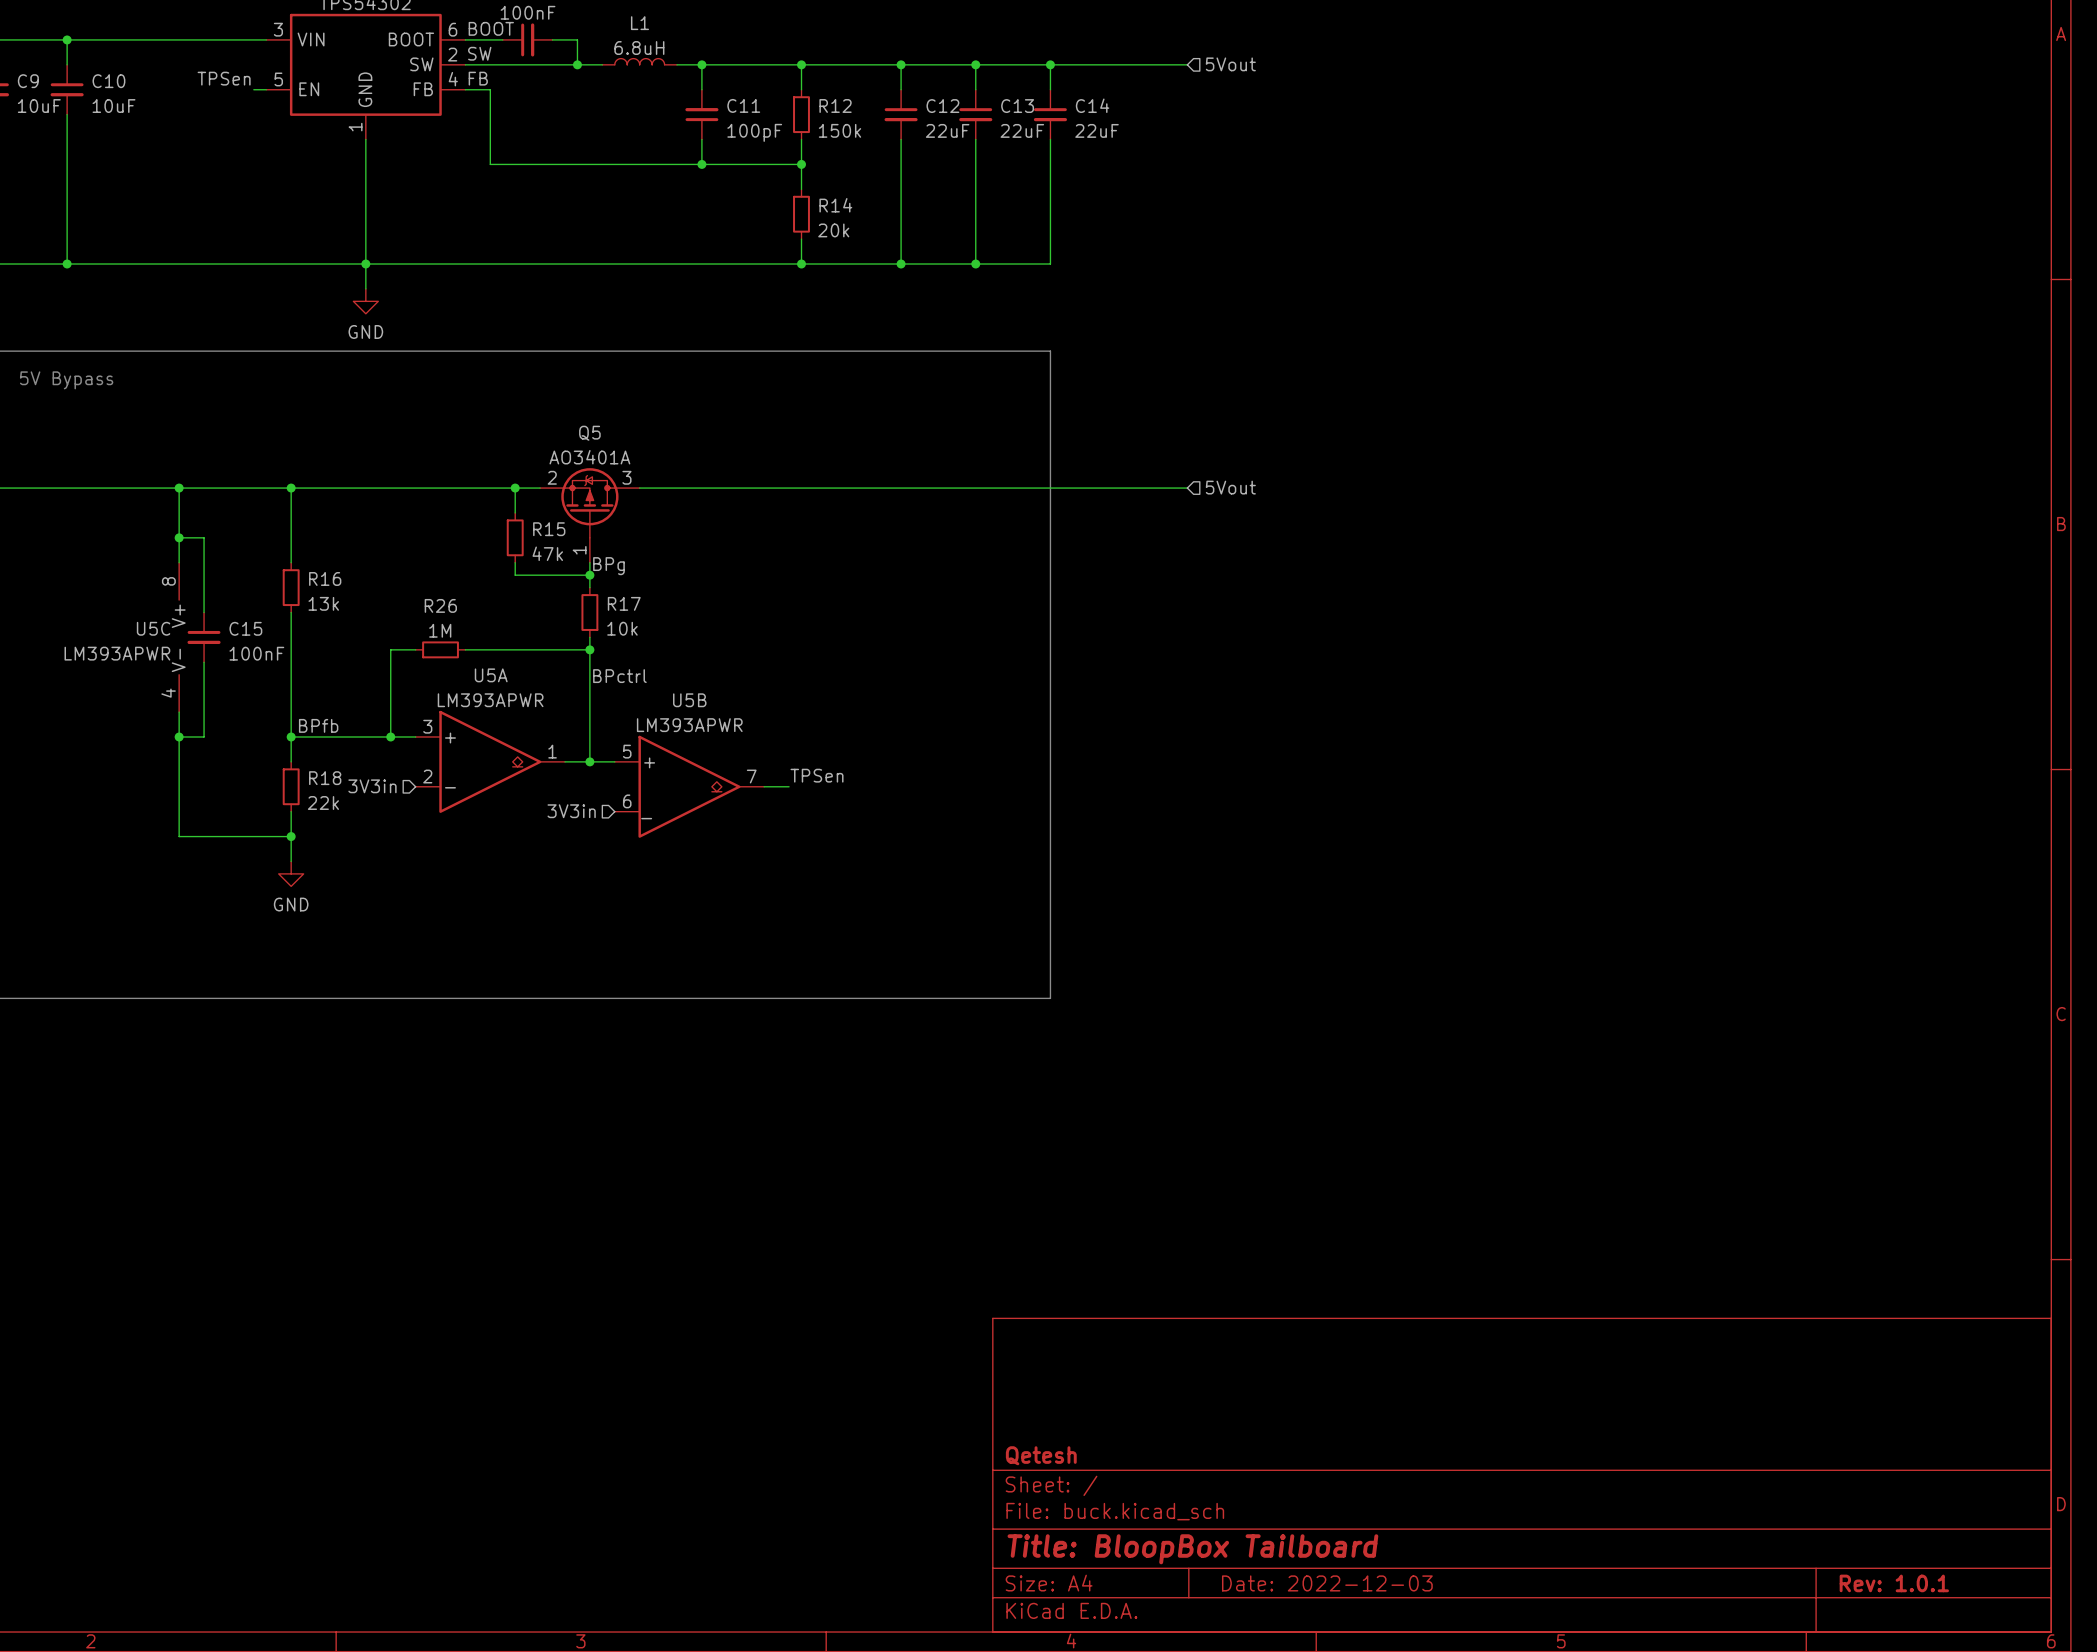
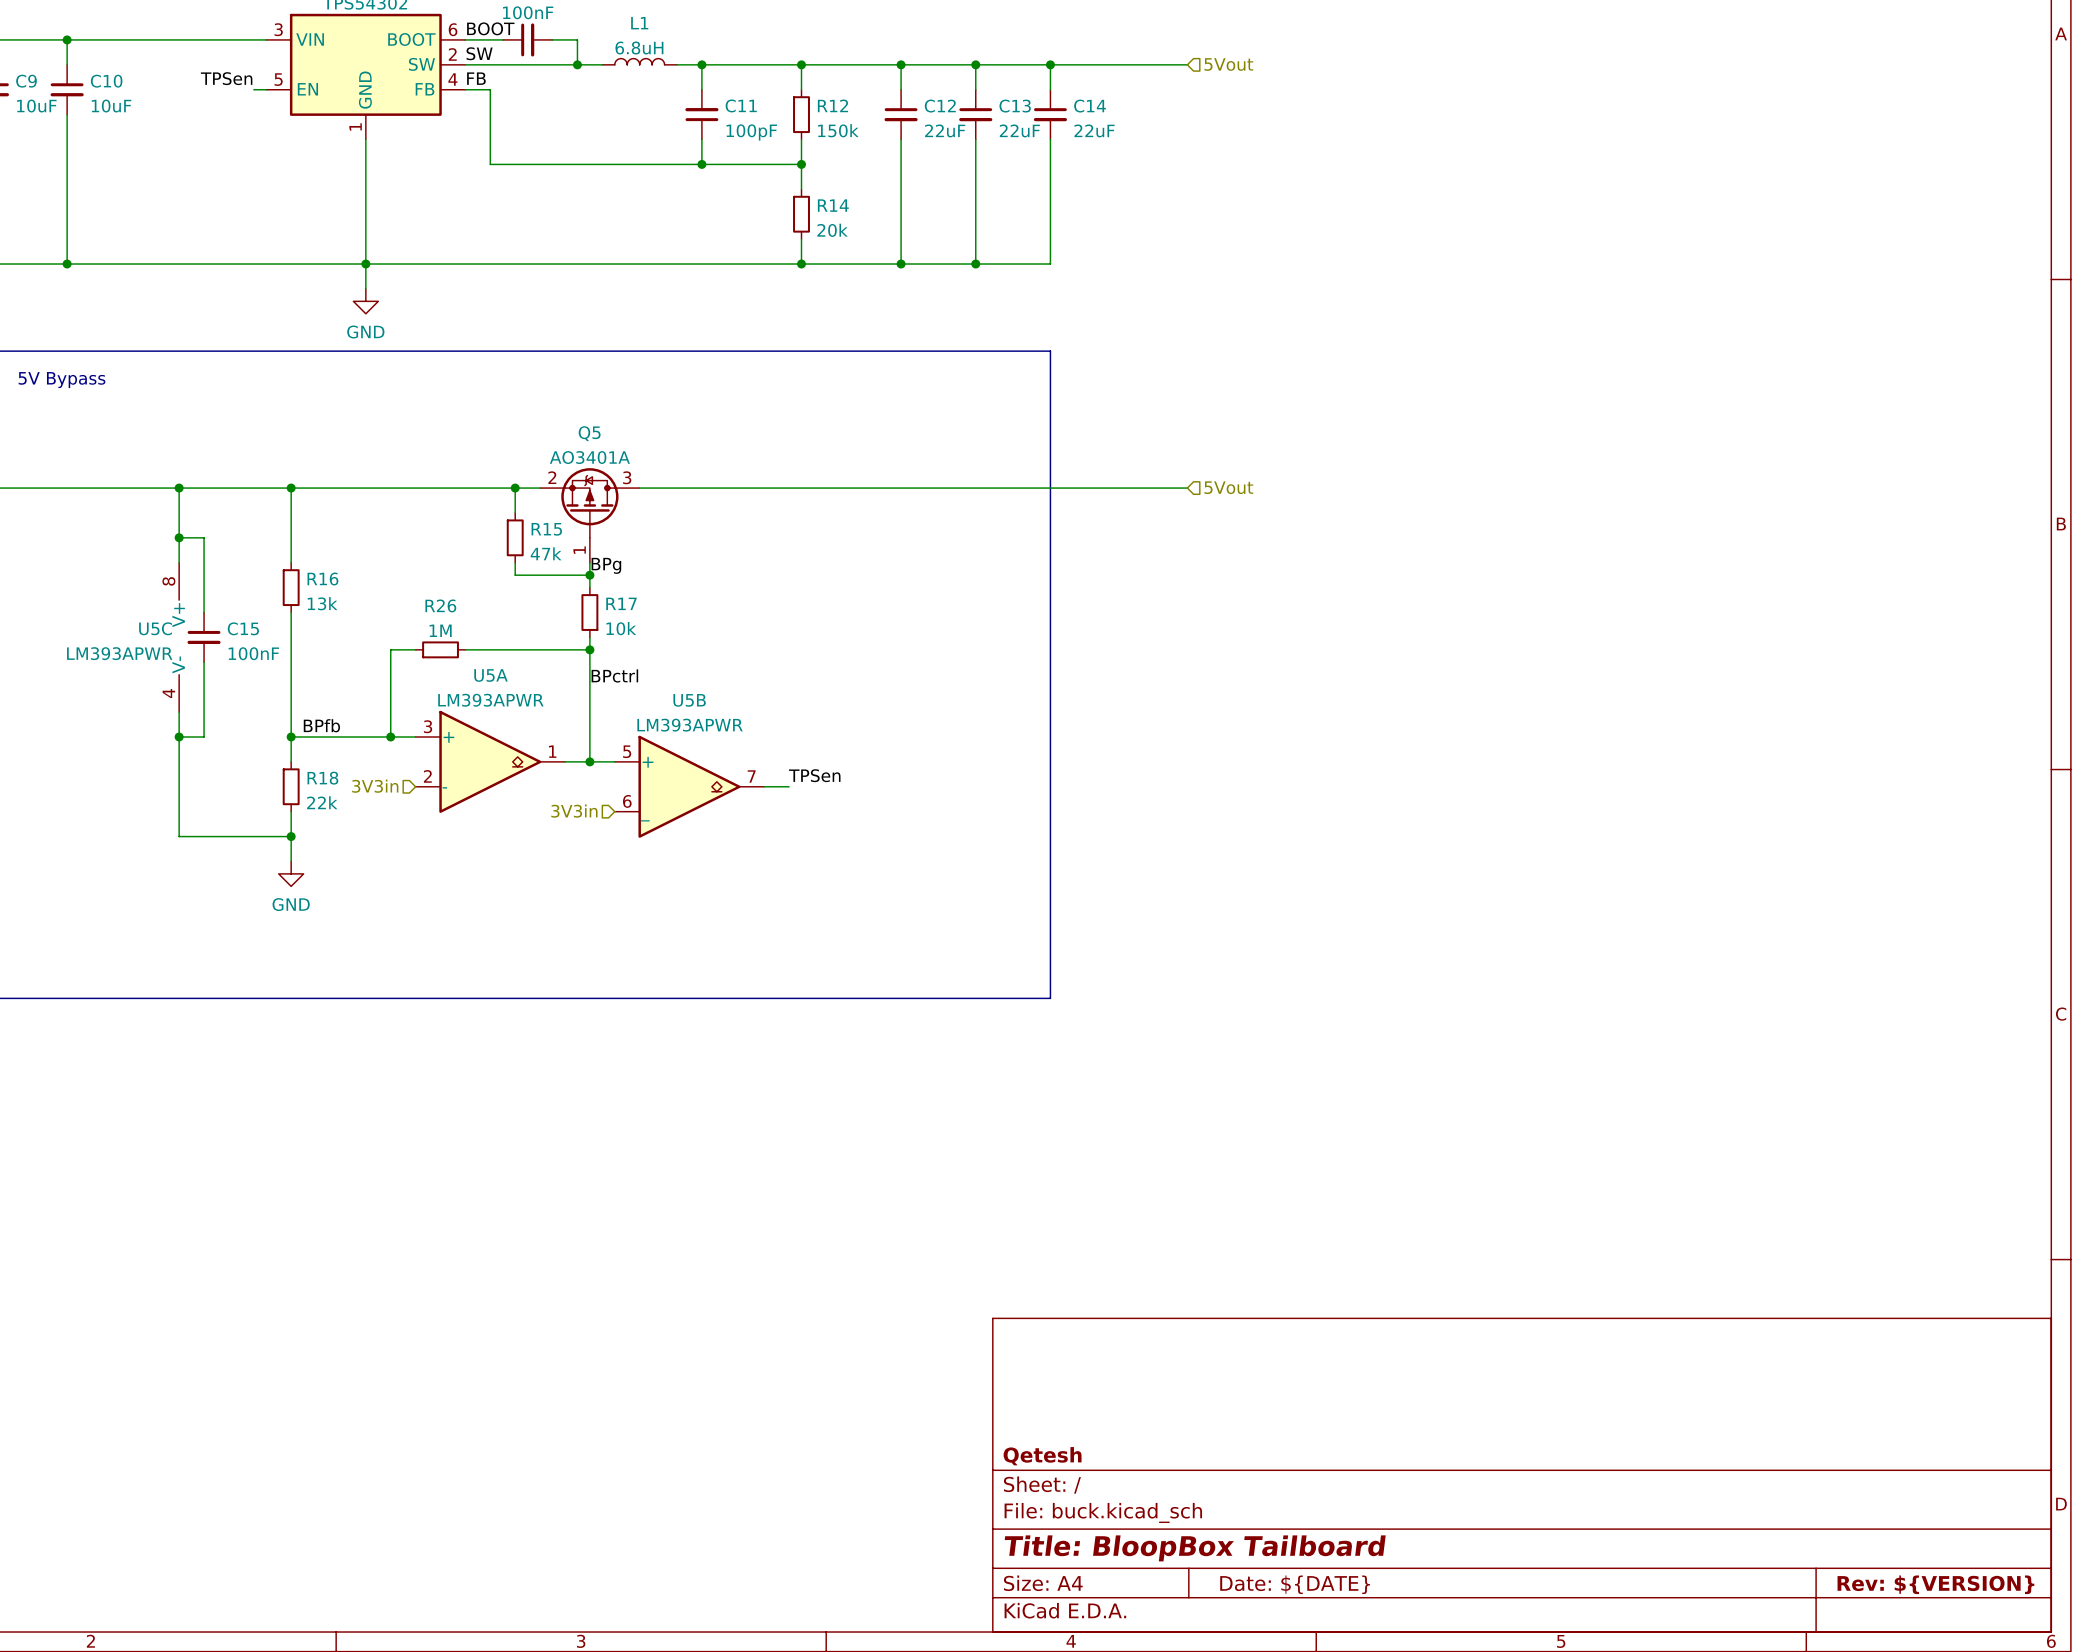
title block: Date: 2022-12-03 (1327, 1583) -> Date: ${DATE} (1295, 1584)
title block: Rev: 1.0.1 (1894, 1583) -> Rev: ${VERSION} (1935, 1584)

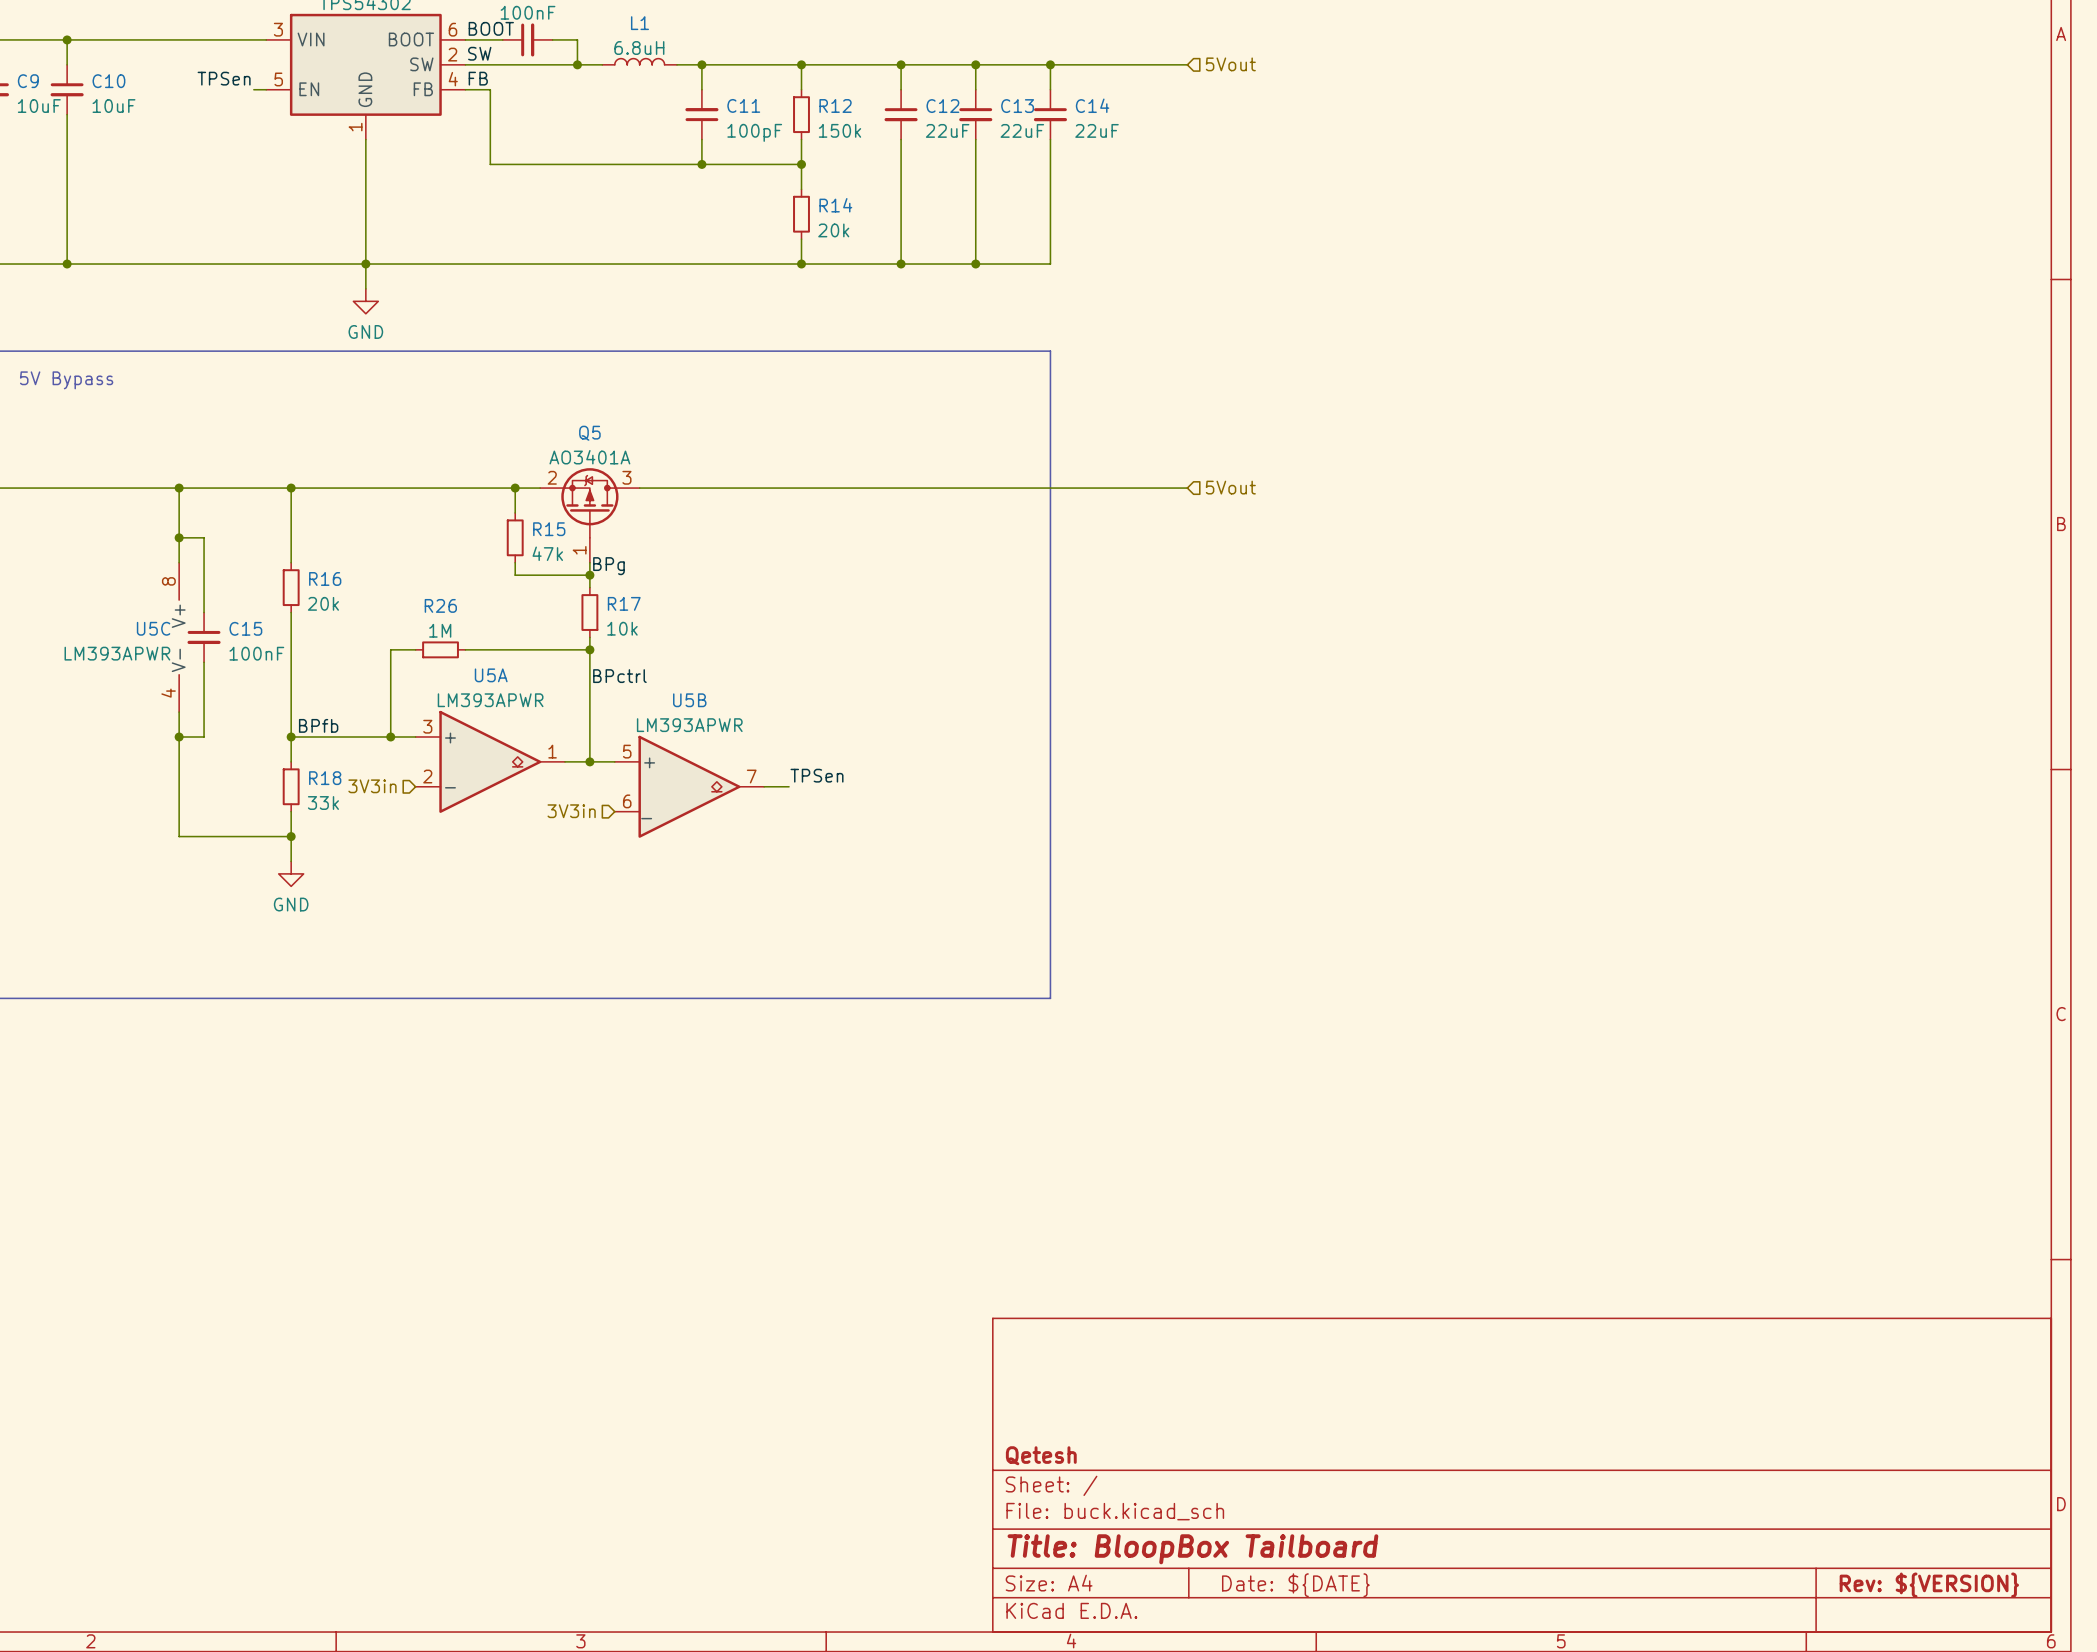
R16 value: 13k (322, 603) -> 20k (323, 603)
R18 value: 22k (322, 802) -> 33k (323, 803)

